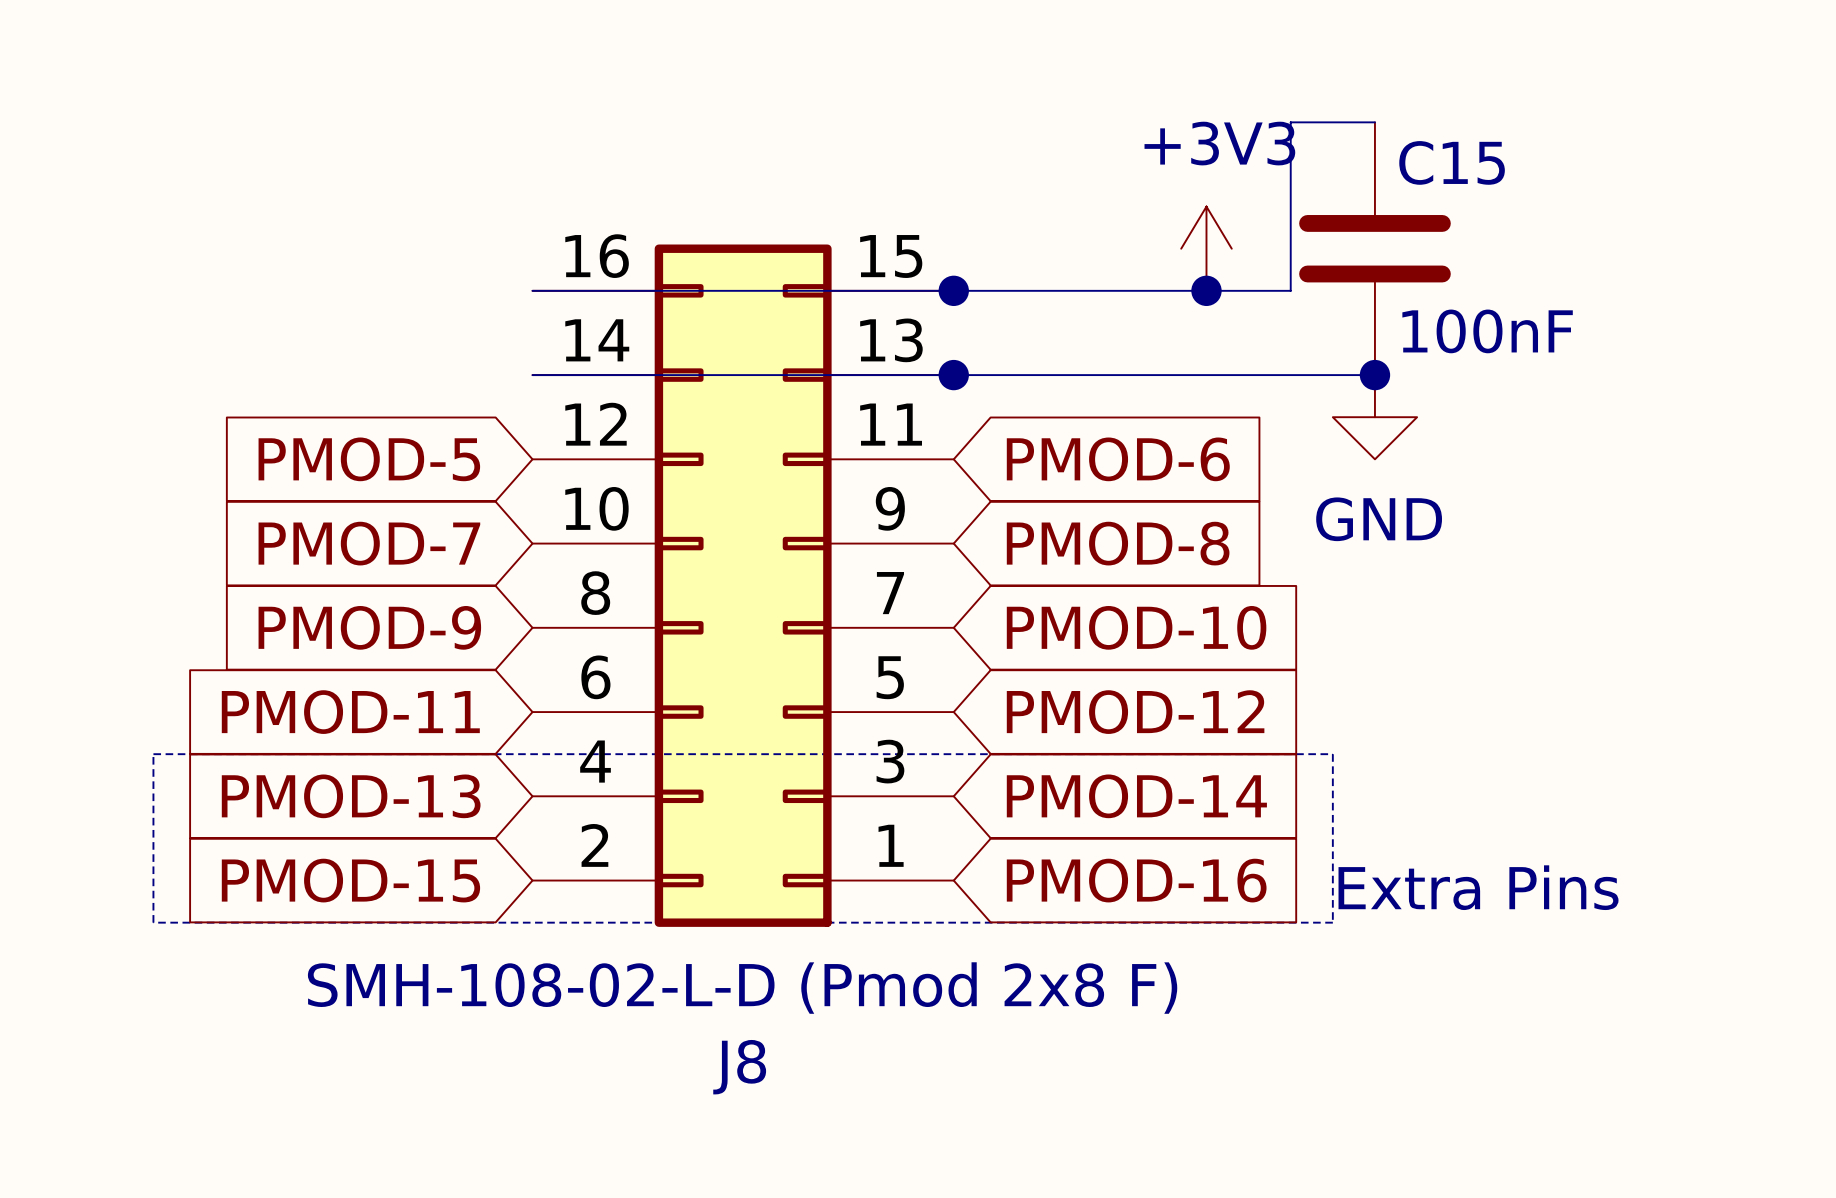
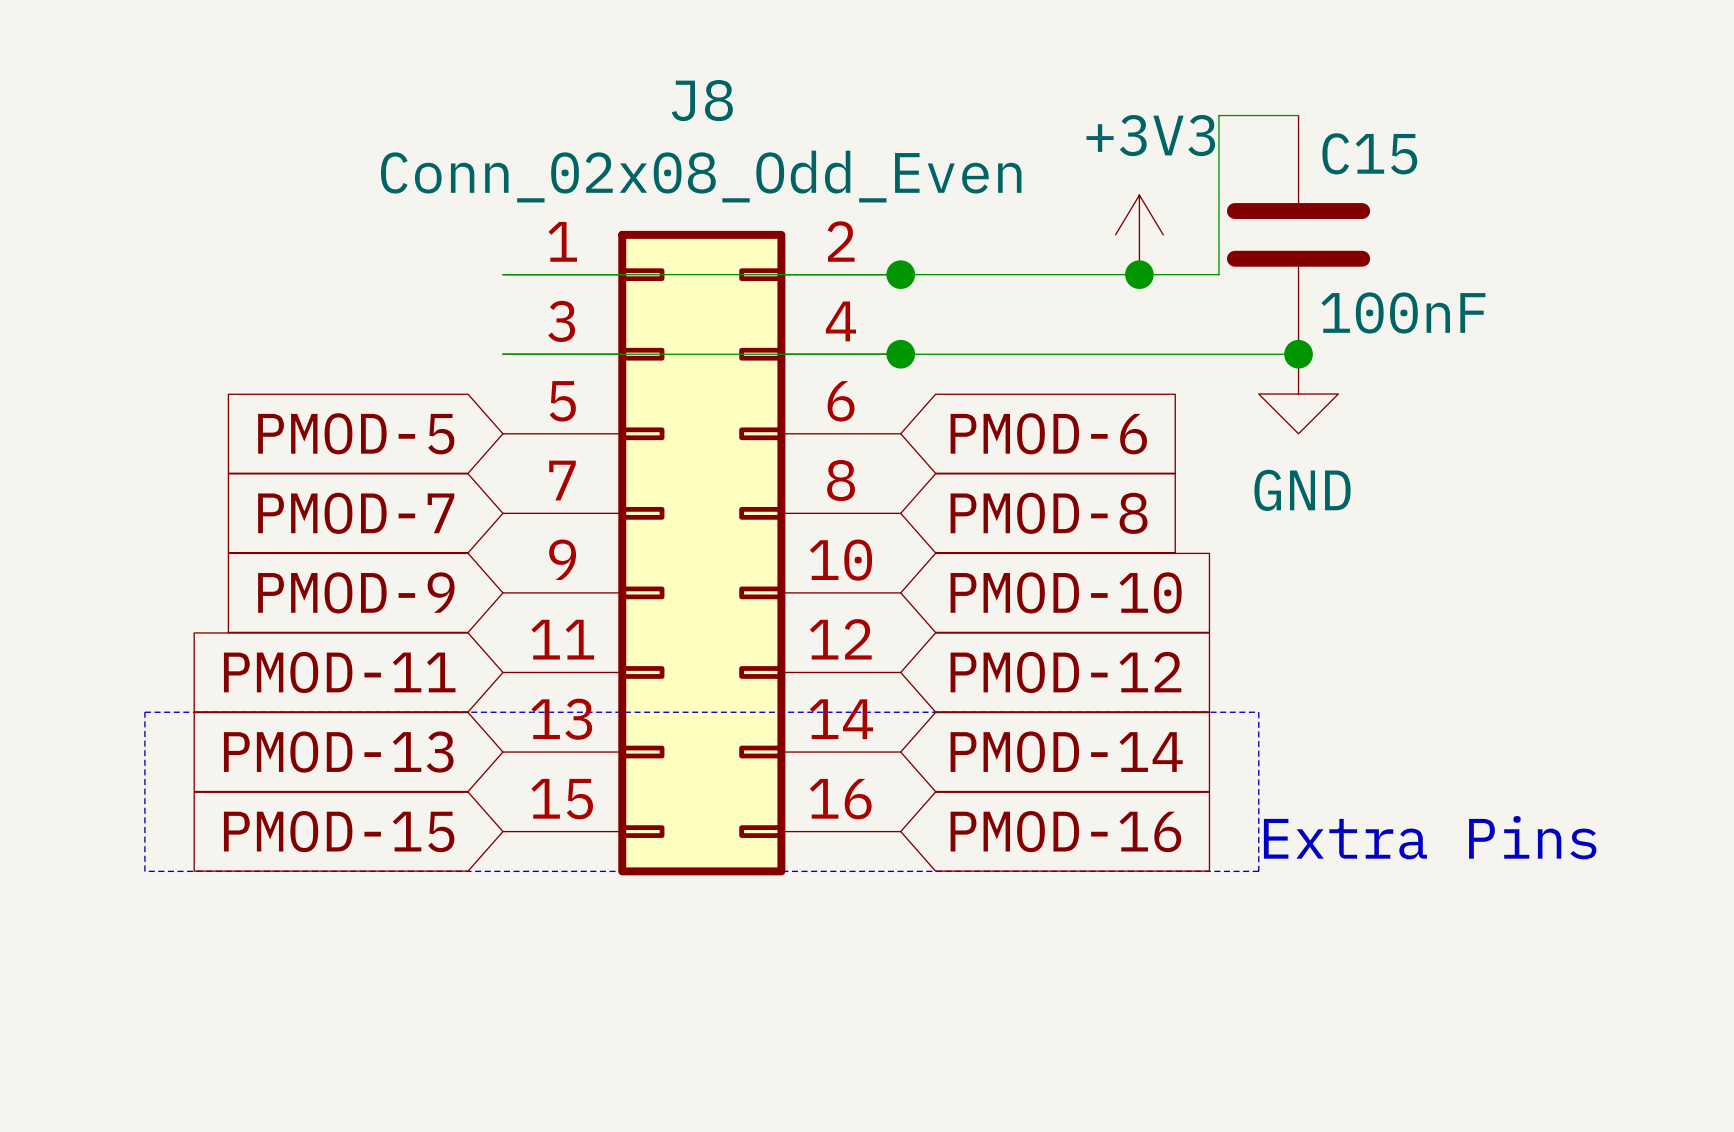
J8 rotation: 0° (743, 585) -> 180° (701, 553)
J8 value: SMH-108-02-L-D (Pmod 2x8 F) (742, 988) -> Conn_02x08_Odd_Even (701, 176)

